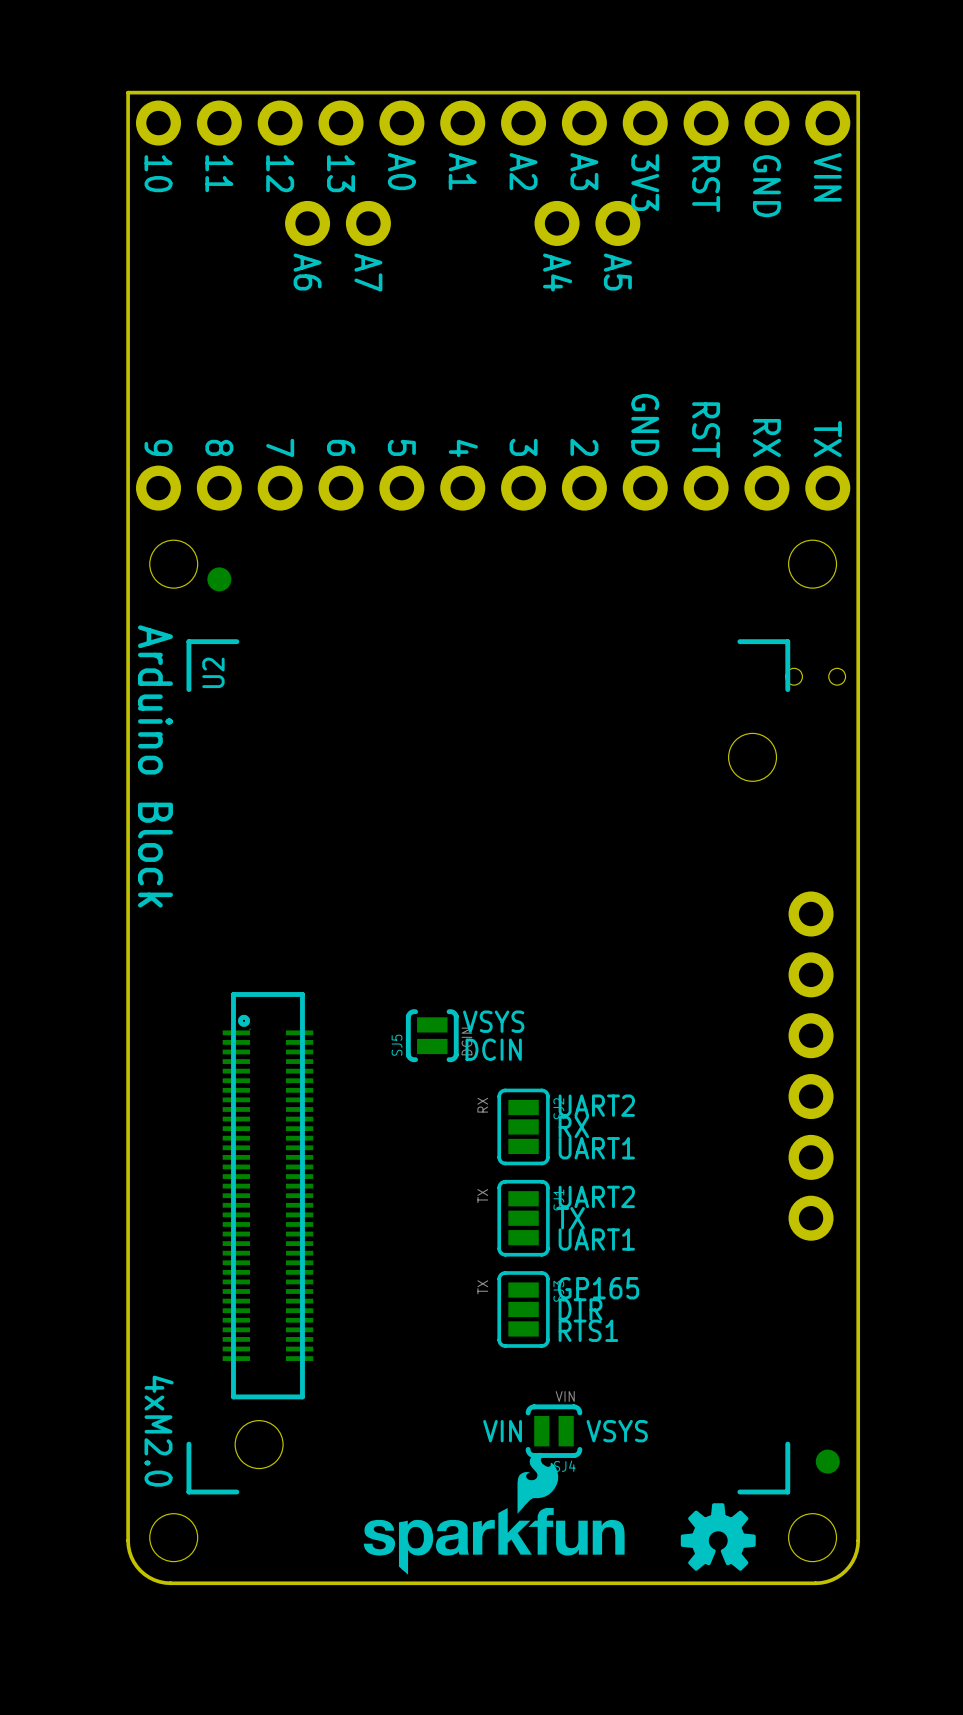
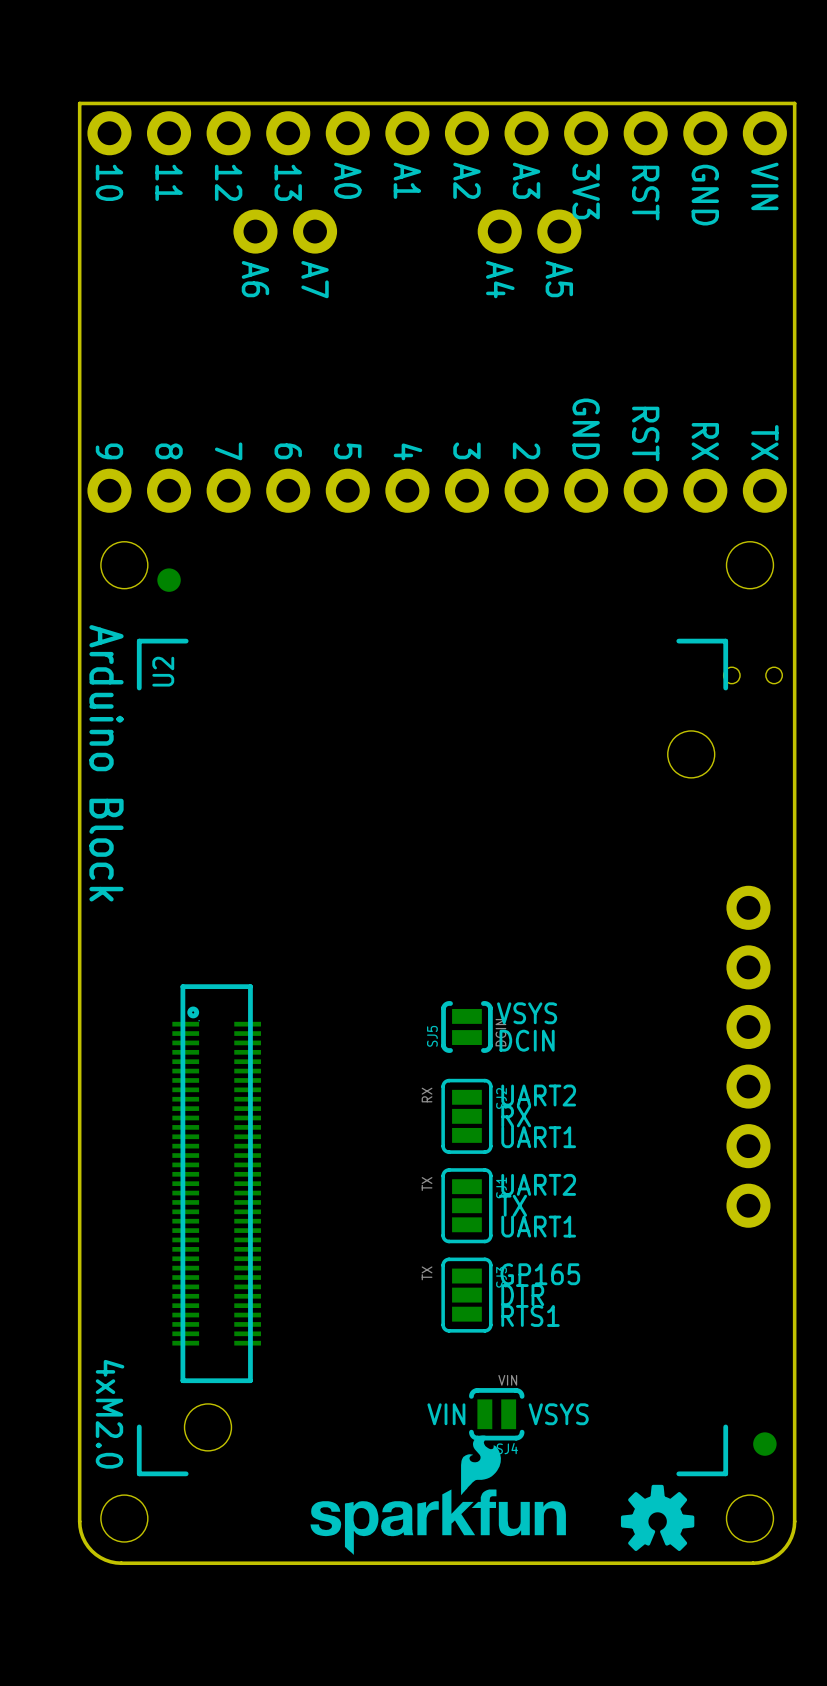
text position: VSYS (493, 1021) -> VSYS (527, 1013)
SJ5 position: (432, 1035) -> (466, 1026)
text position: DCIN (493, 1049) -> DCIN (527, 1040)

